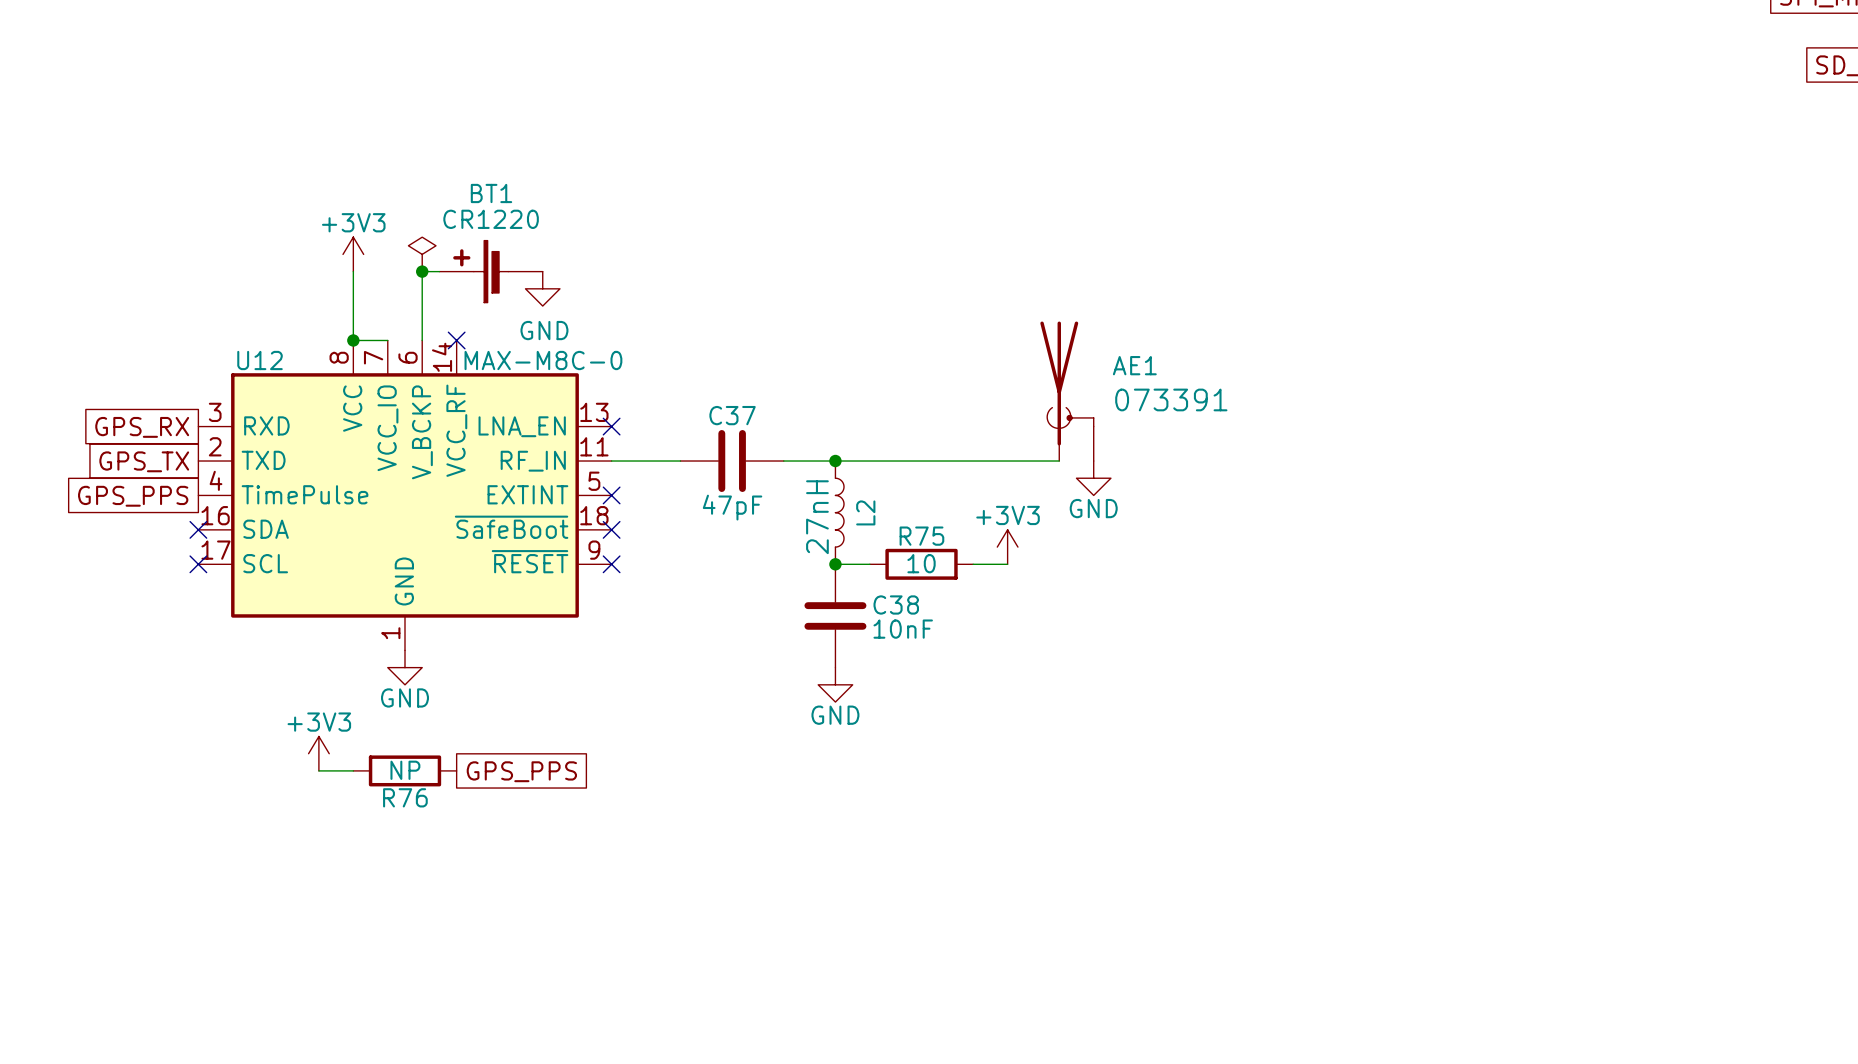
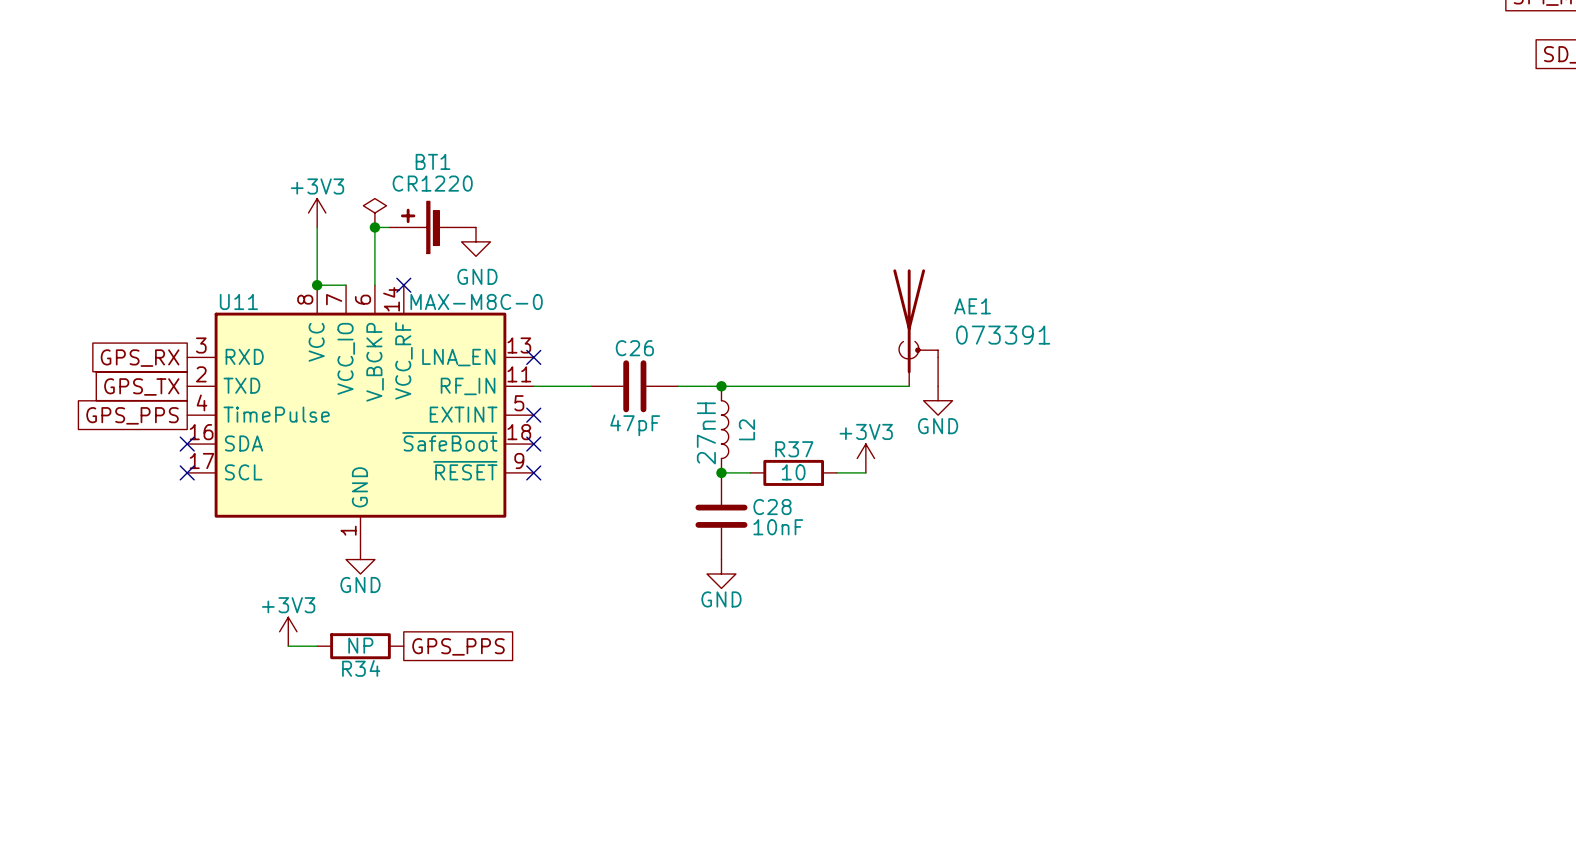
U12 name: U12 (260, 360) -> U11 (238, 301)
C37 name: C37 (732, 415) -> C26 (634, 348)
R75 name: R75 (921, 536) -> R37 (794, 449)
C38 name: C38 (896, 604) -> C28 (772, 507)
R76 name: R76 (405, 797) -> R34 (361, 668)

